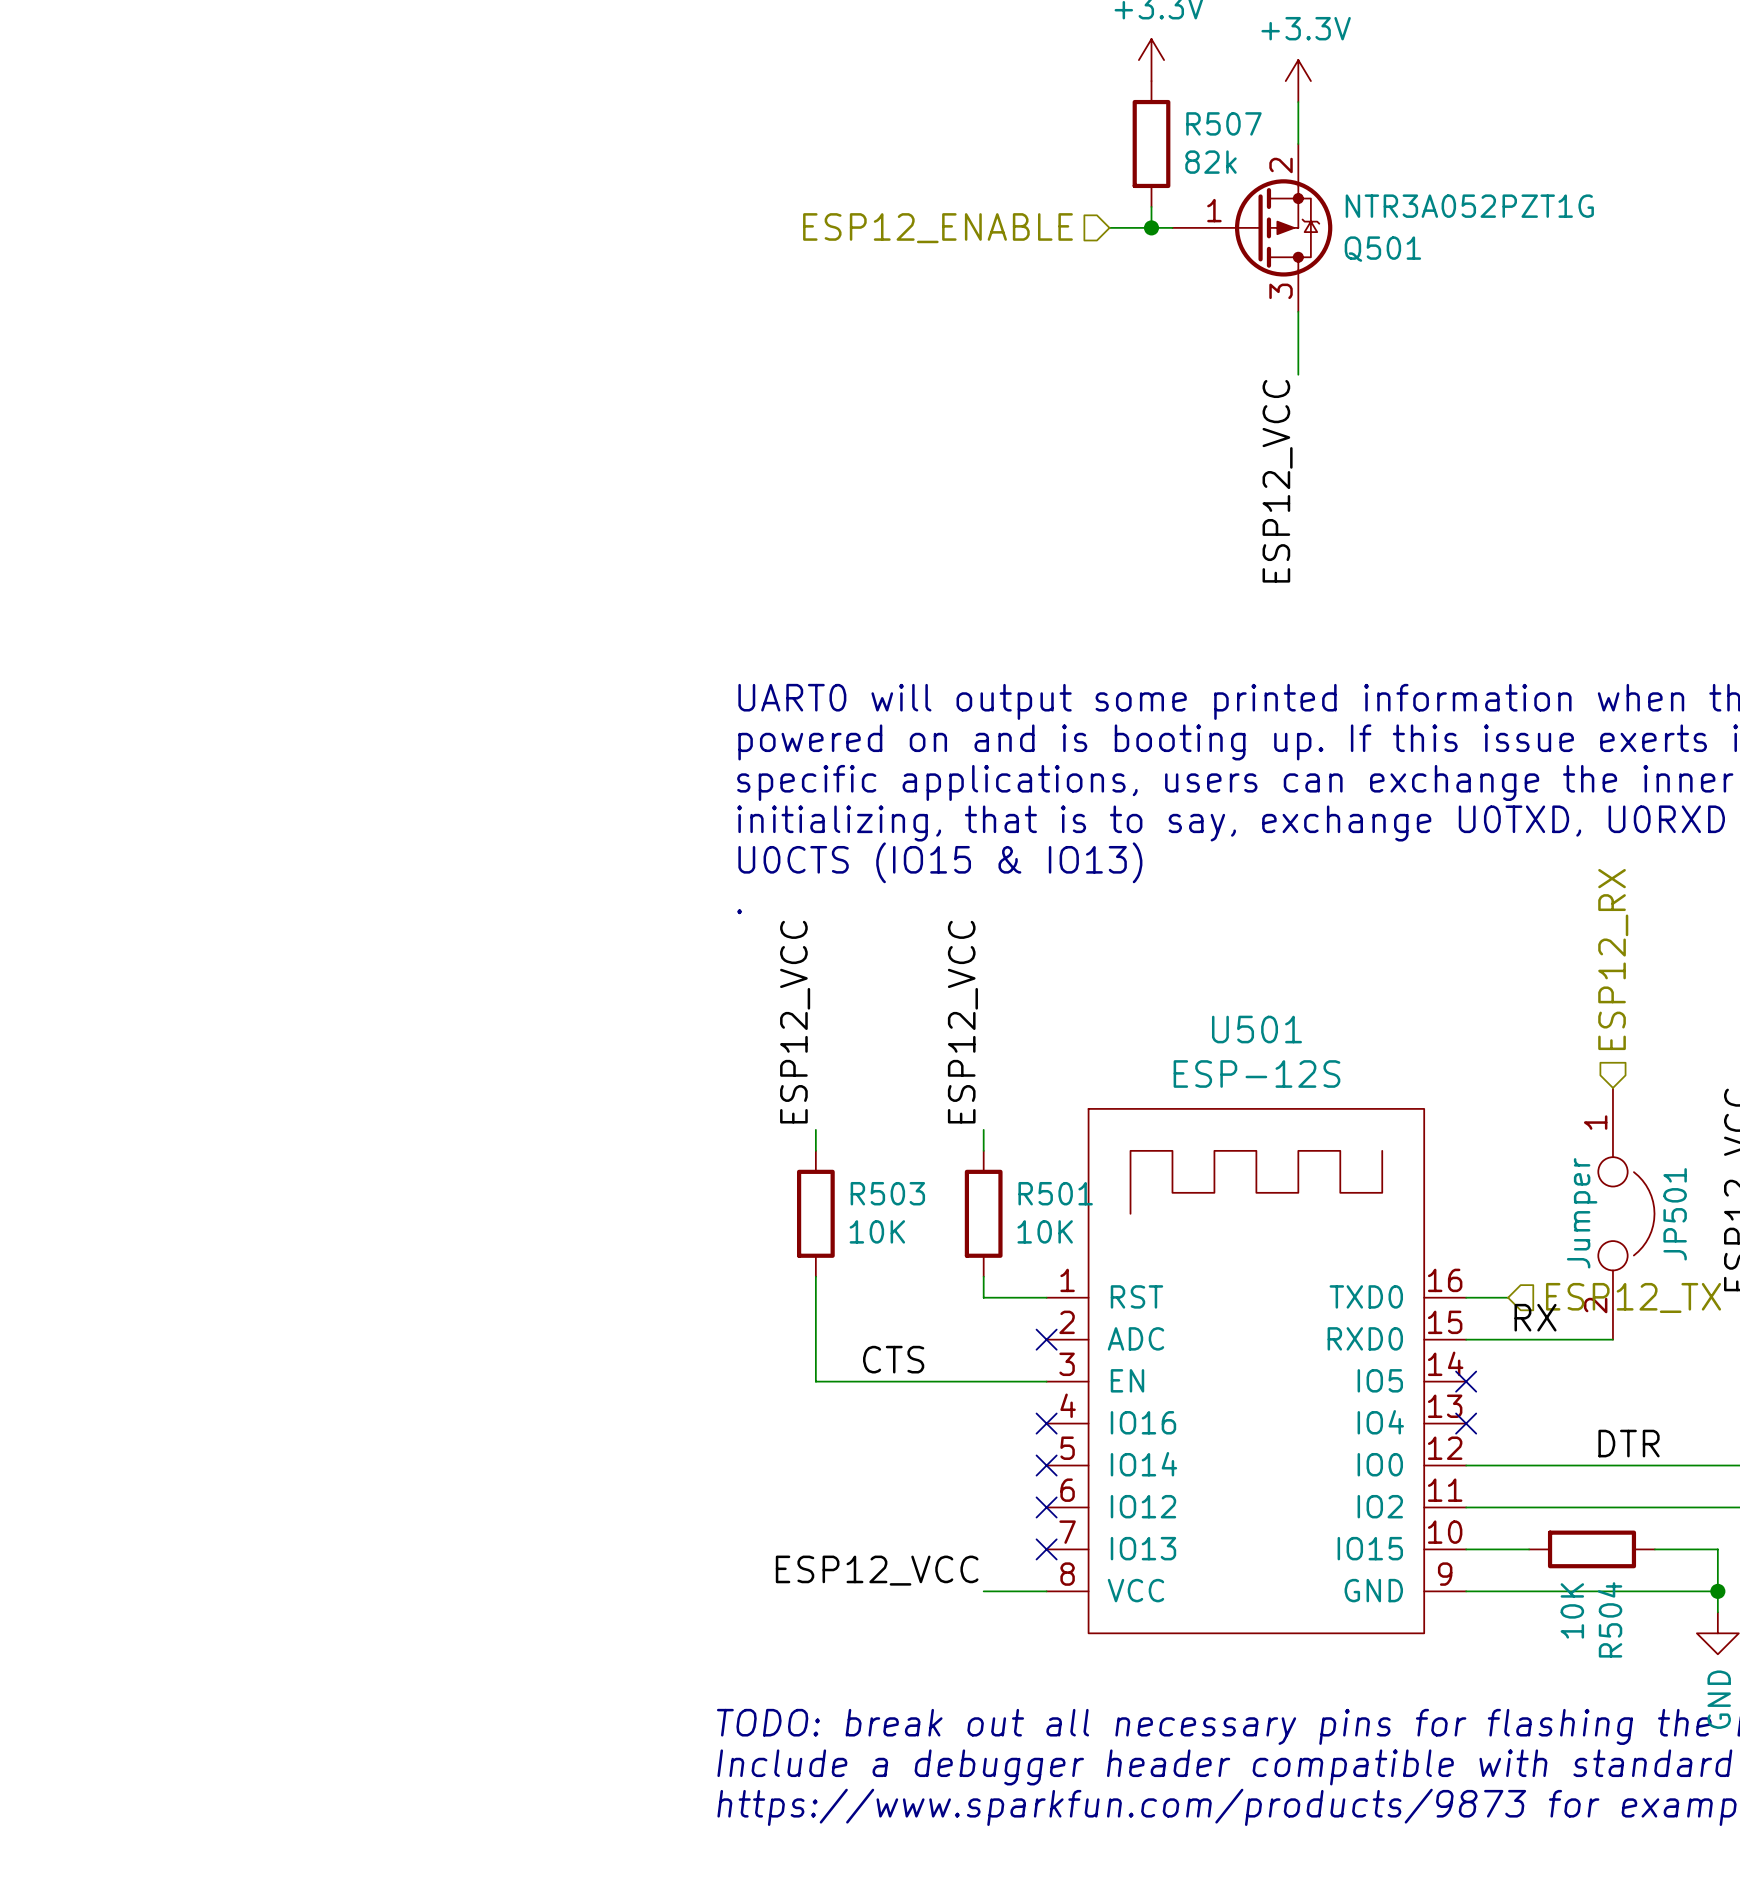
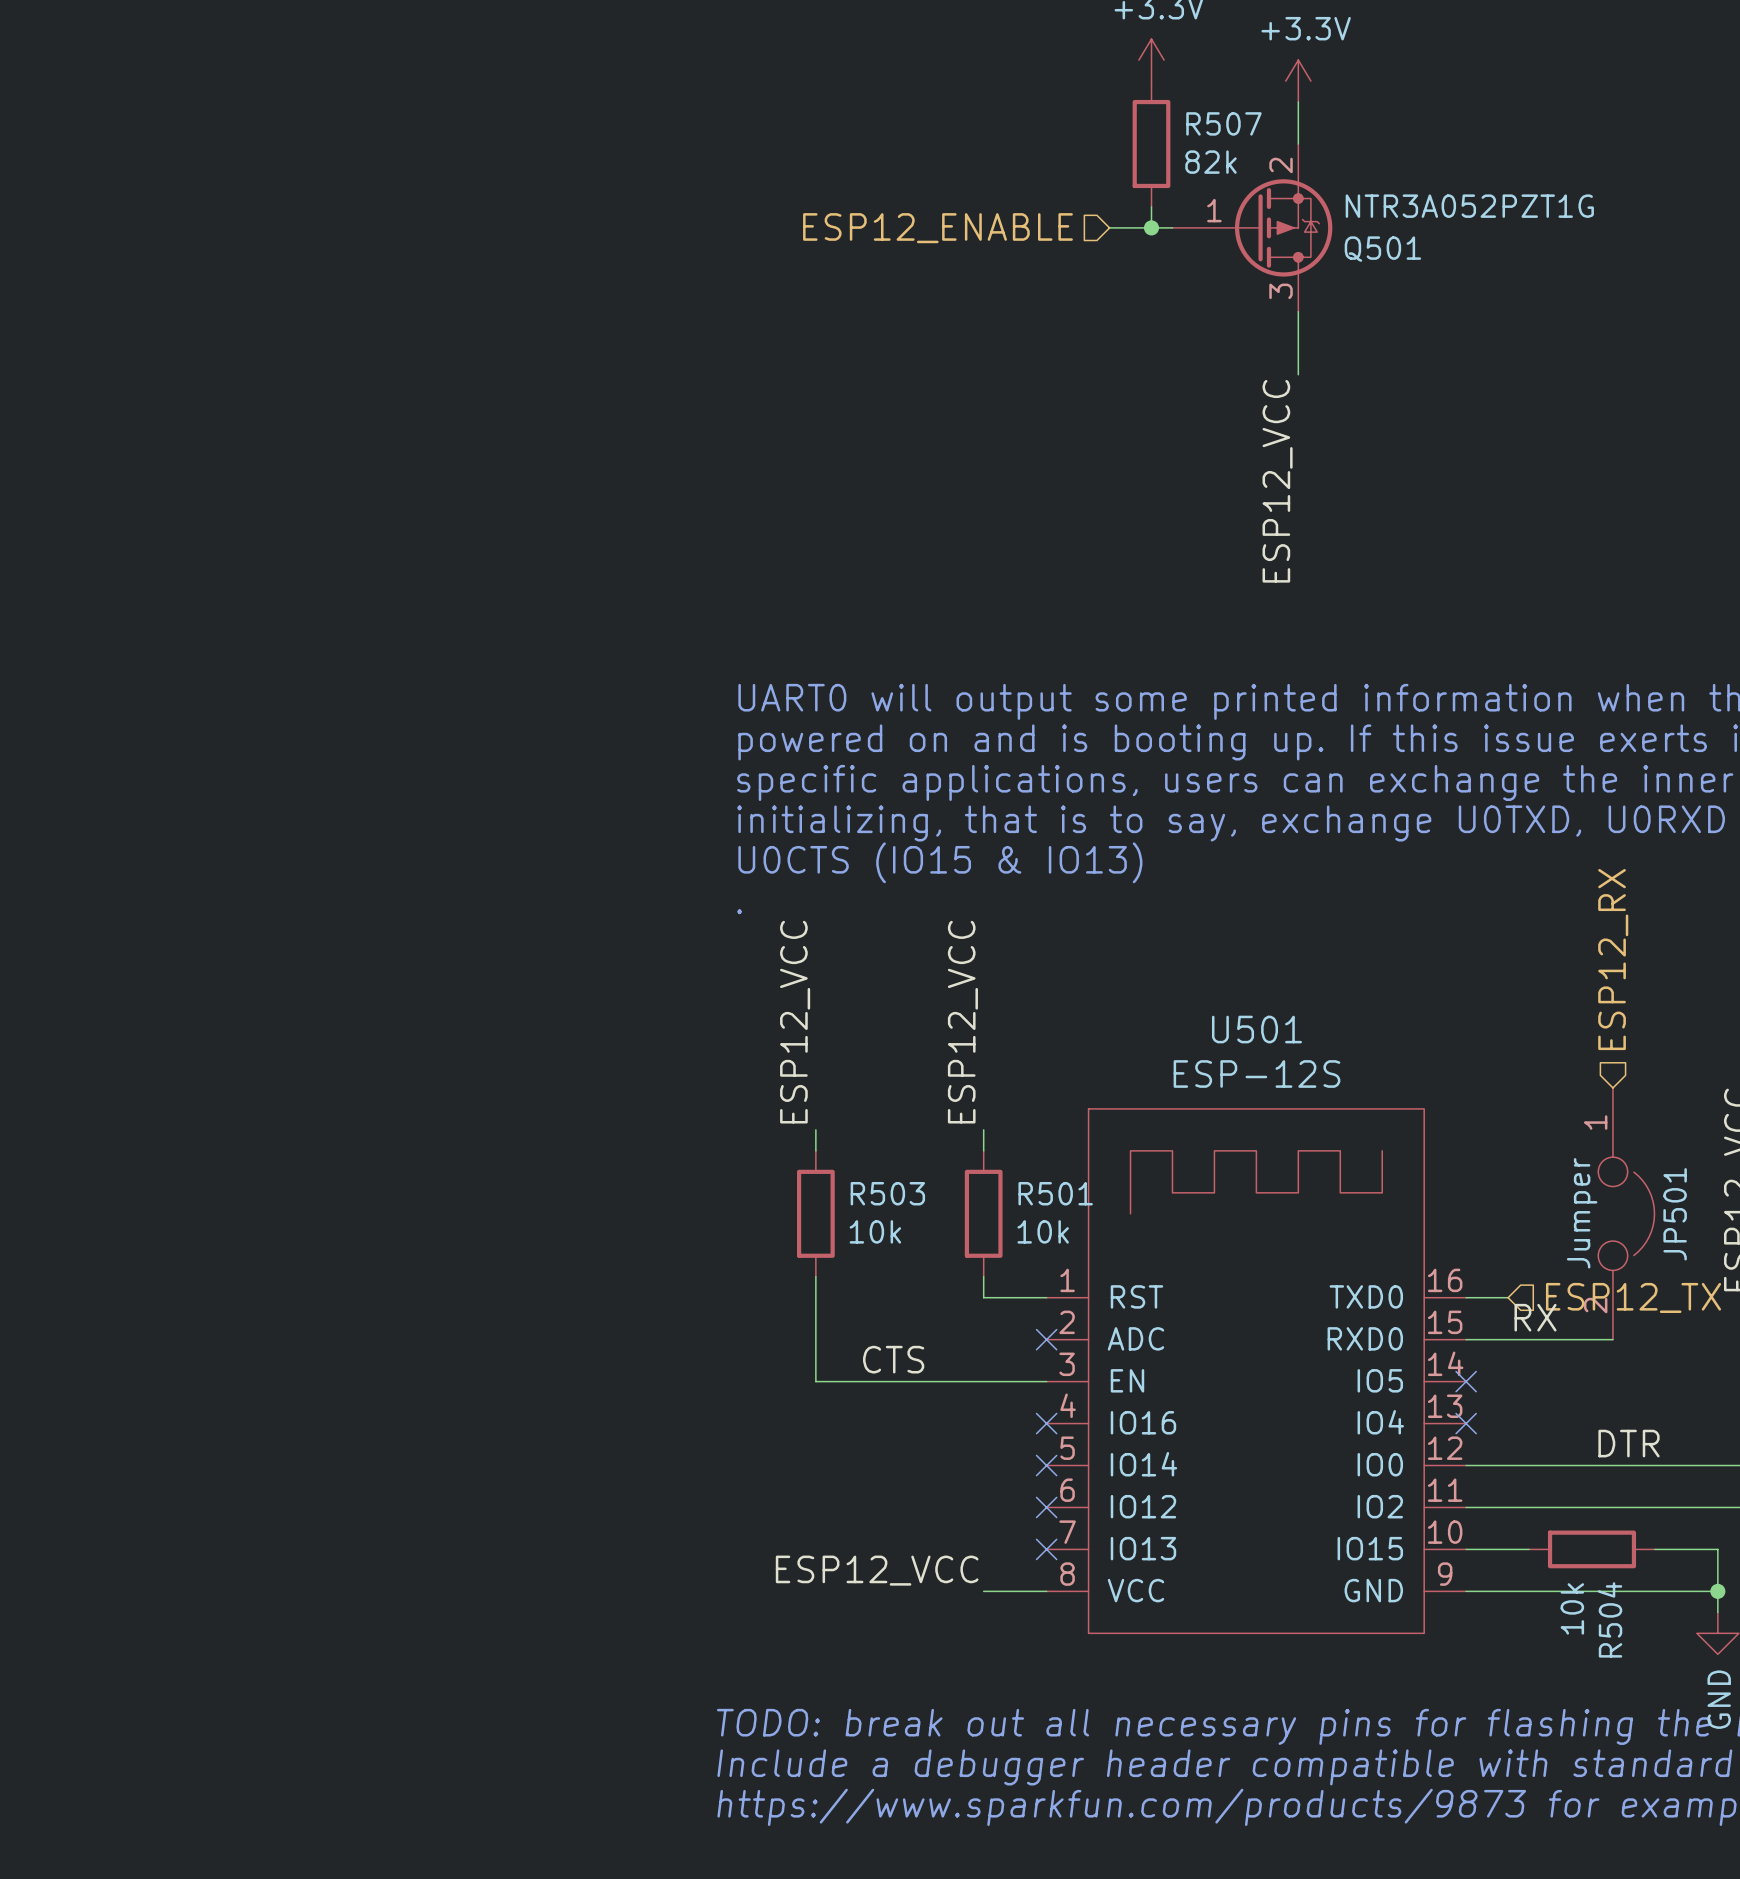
R503 value: 10K (877, 1231) -> 10k (875, 1231)
R501 value: 10K (1045, 1231) -> 10k (1043, 1231)
R504 value: 10K (1572, 1610) -> 10k (1572, 1608)

